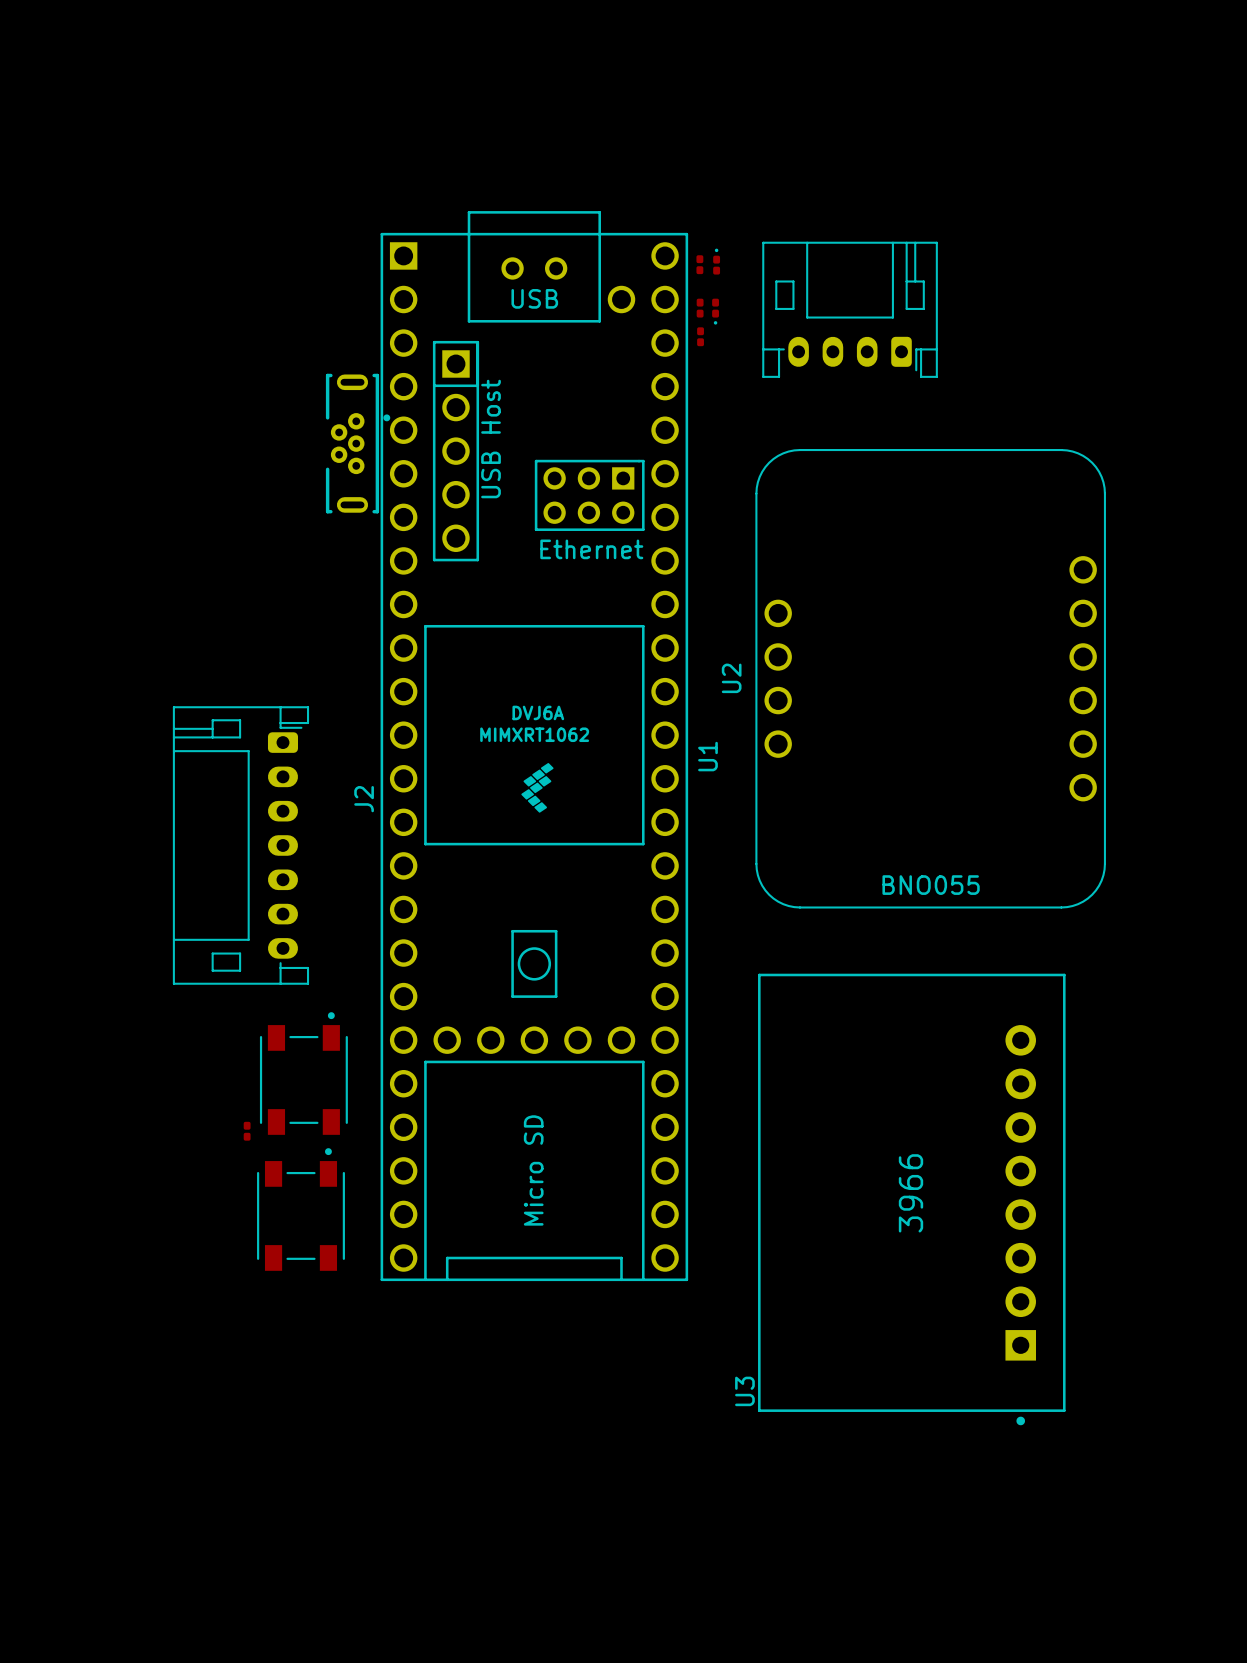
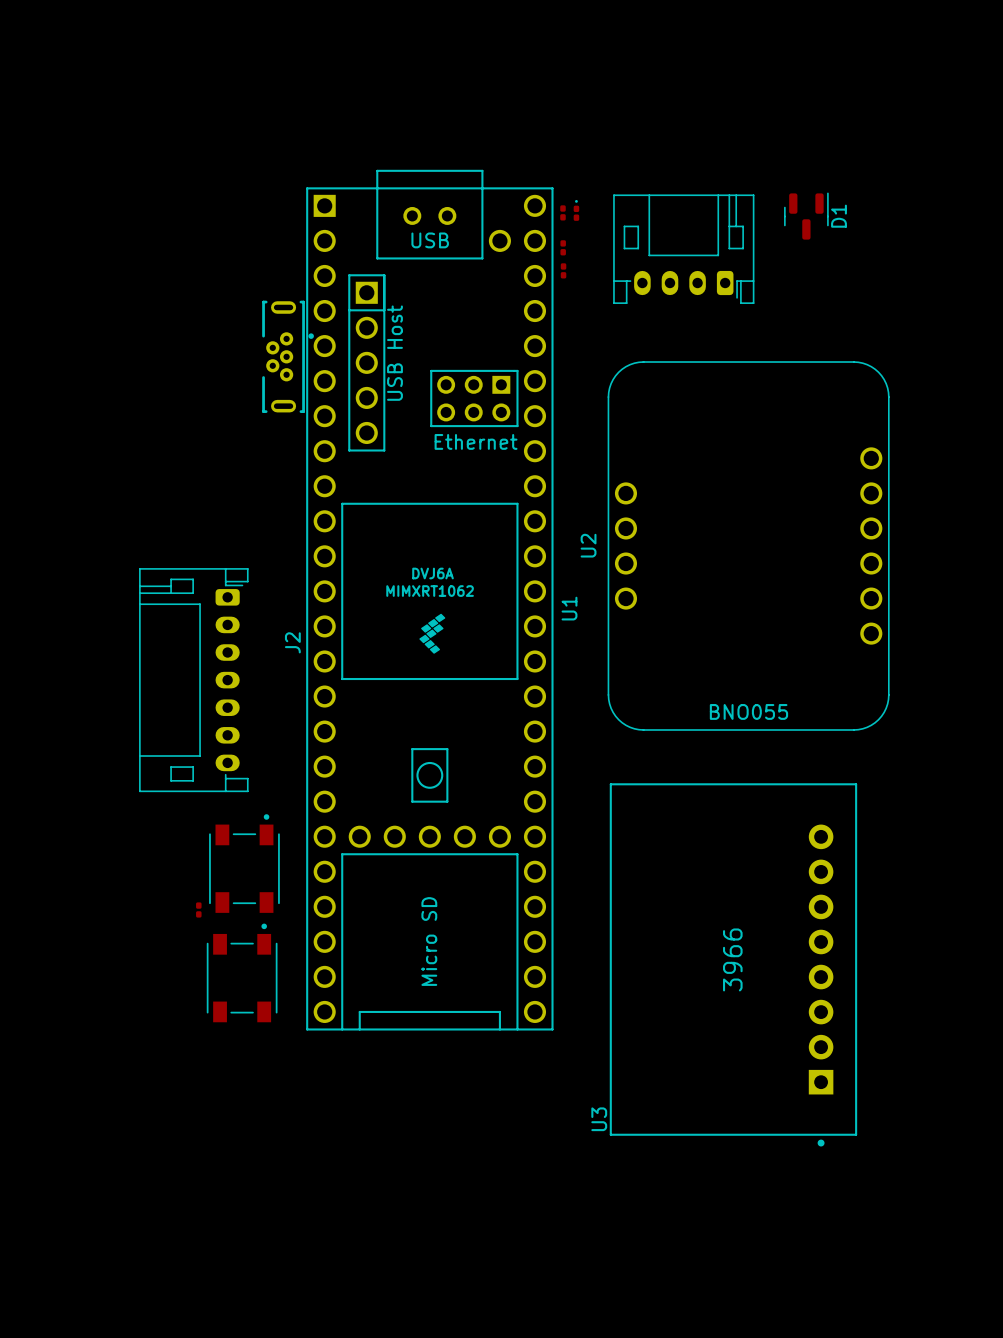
D1: none -> (806, 216)
part: (715, 311) -> none

